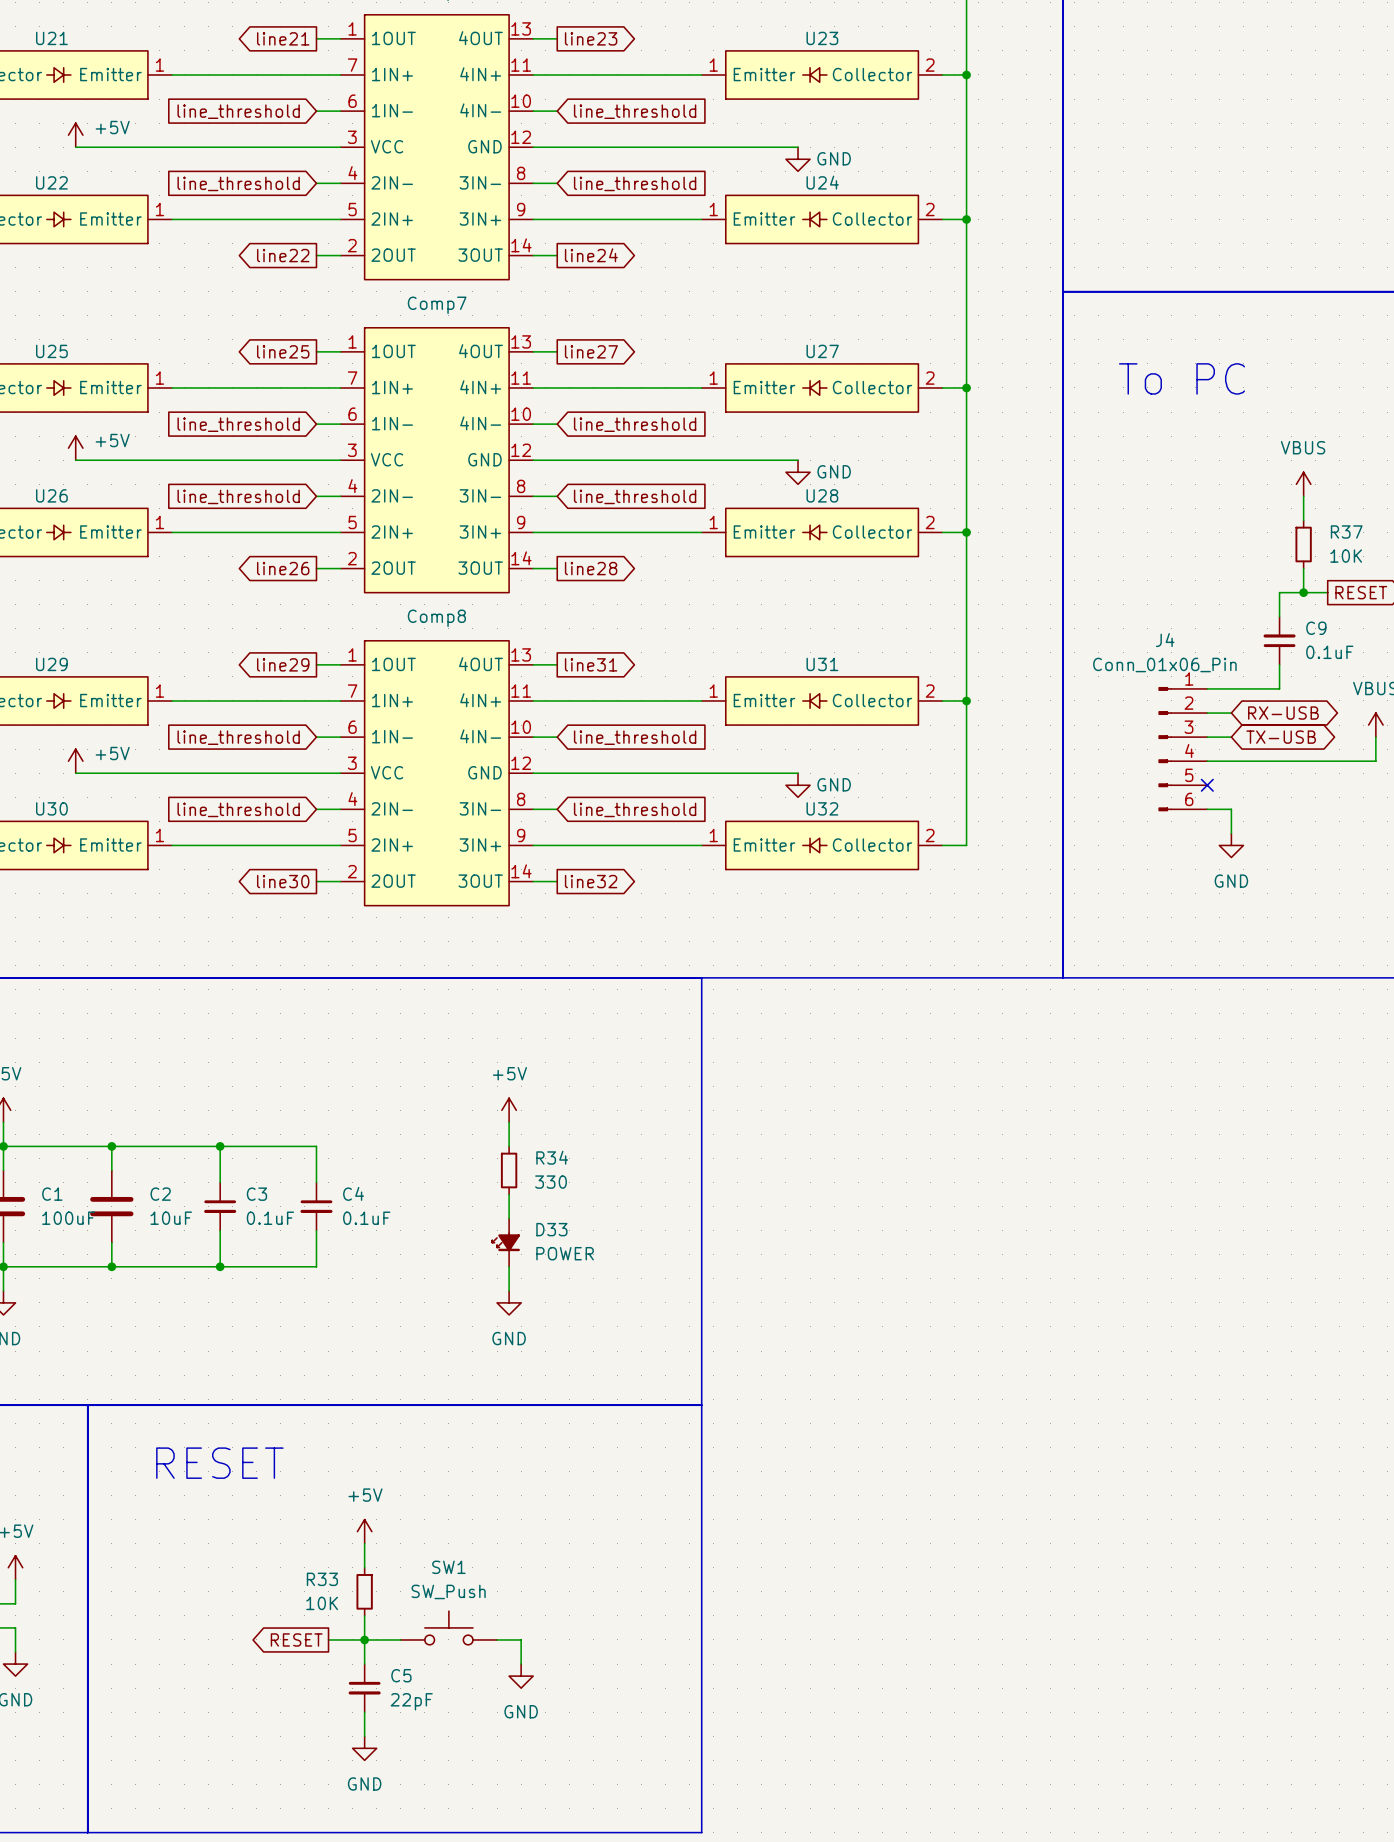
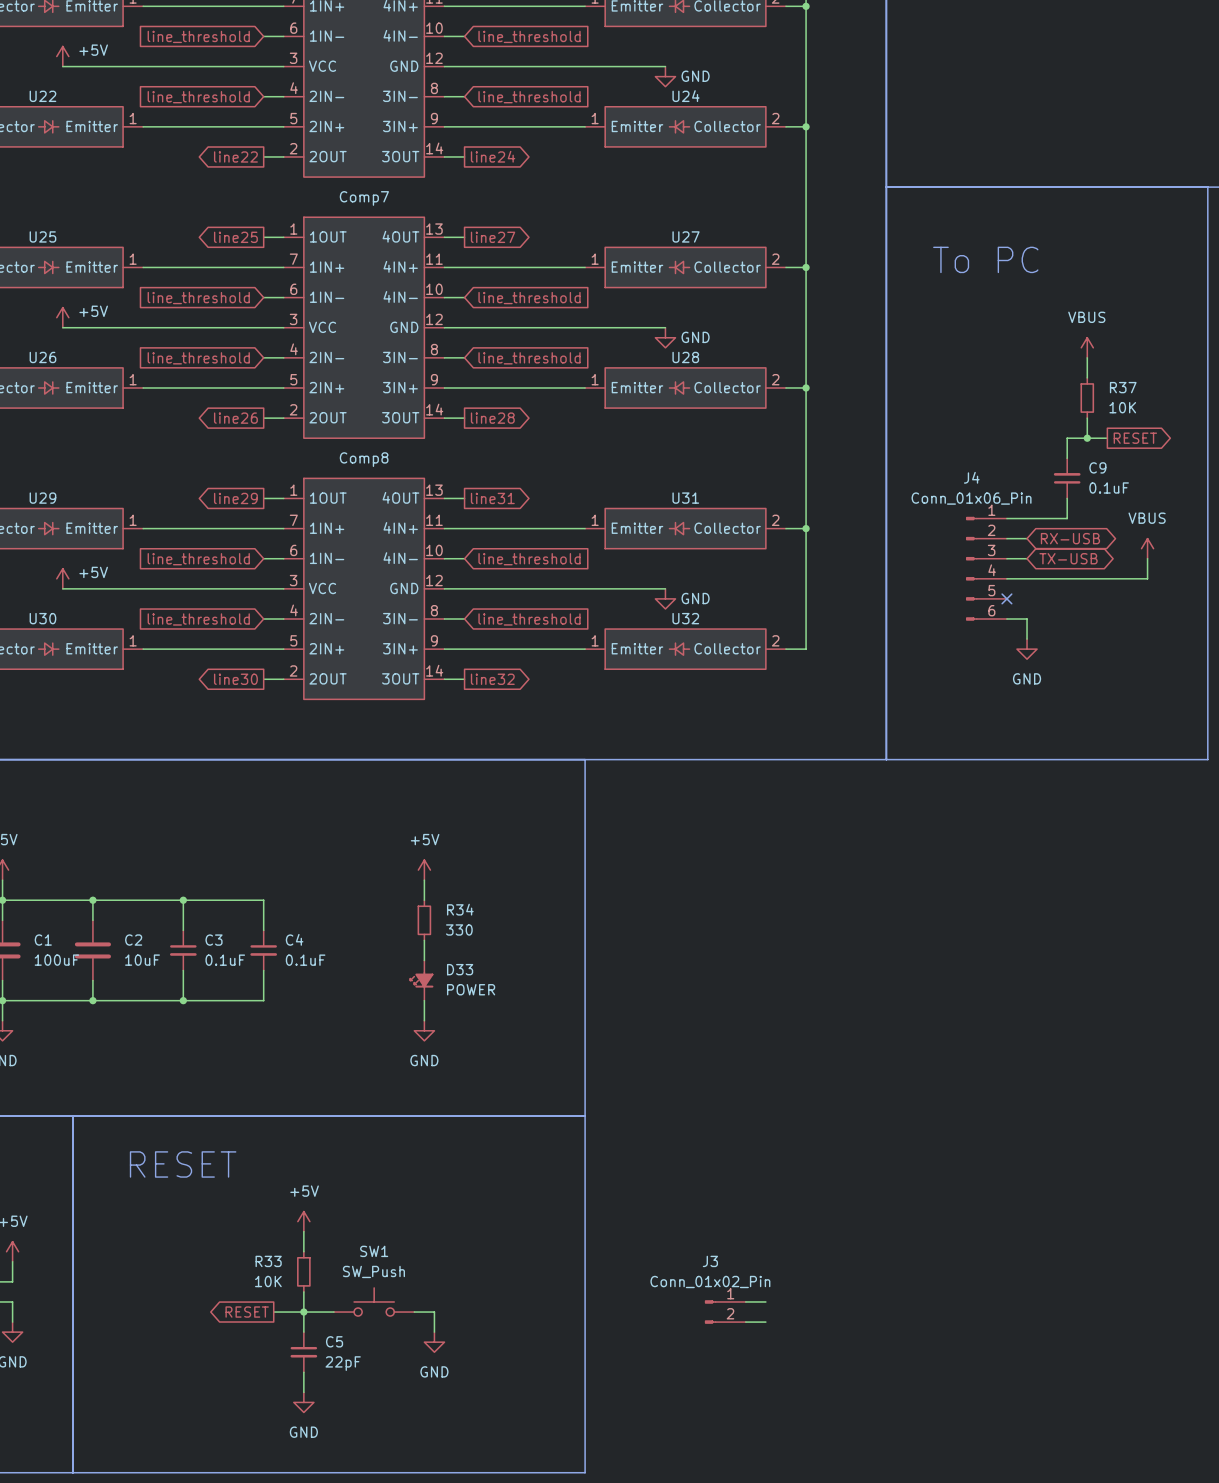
wire: none -> (745, 1301) (765, 1301)
J3: none -> Conn_01x02_Pin (725, 1312)
wire: none -> (745, 1322) (765, 1322)

